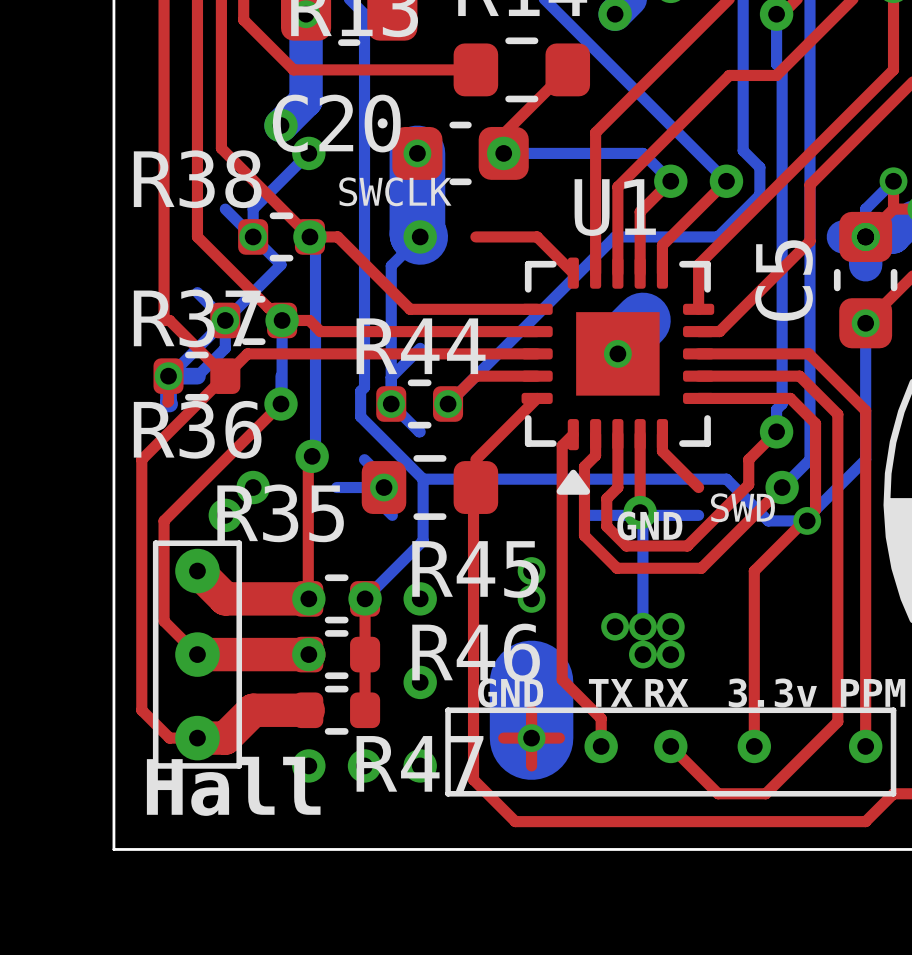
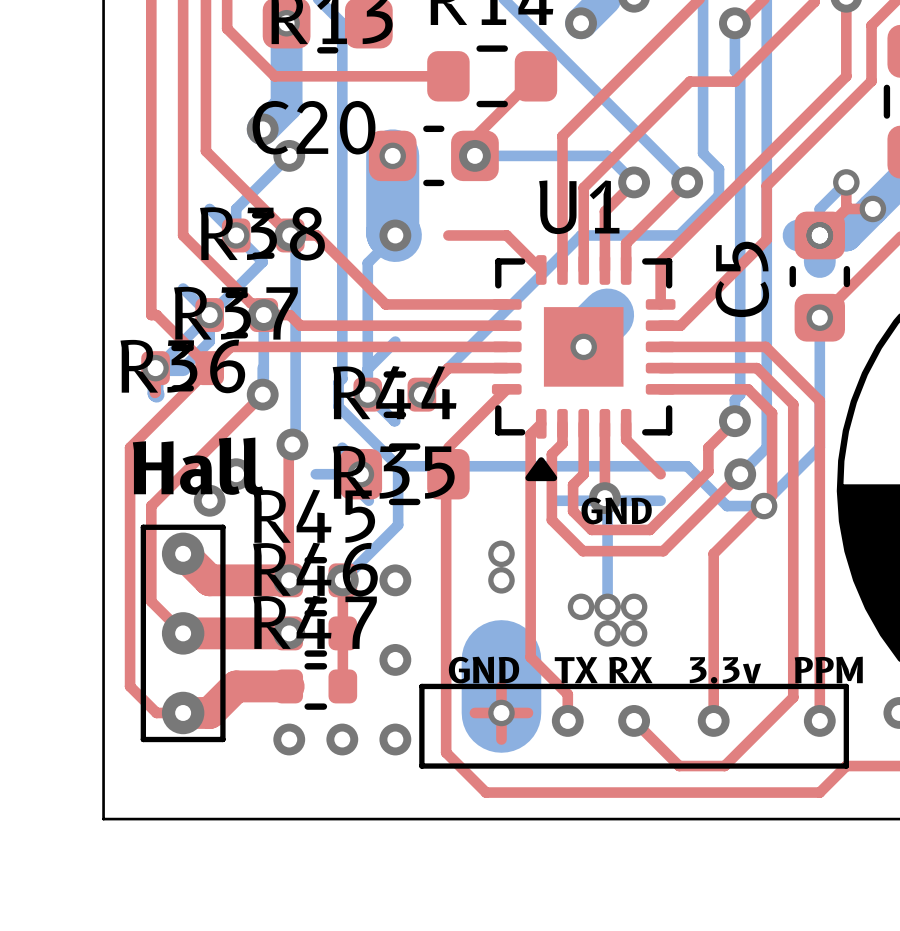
R38 name position: R38 (197, 179) -> R38 (262, 233)
text: SWCLK (395, 191) -> none
R37 name position: R37 (197, 318) -> R37 (235, 313)
R44 name position: R44 (421, 346) -> R44 (394, 392)
R36 name position: R36 (197, 429) -> R36 (182, 366)
text: SWD (742, 507) -> none
R35 name position: R35 (280, 513) -> R35 (393, 472)
R45 name position: R45 (475, 569) -> R45 (314, 516)
R46 name position: R46 (476, 652) -> R46 (315, 569)
R47 name position: R47 (420, 763) -> R47 (314, 622)
text position: Hall (233, 786) -> Hall (198, 466)

